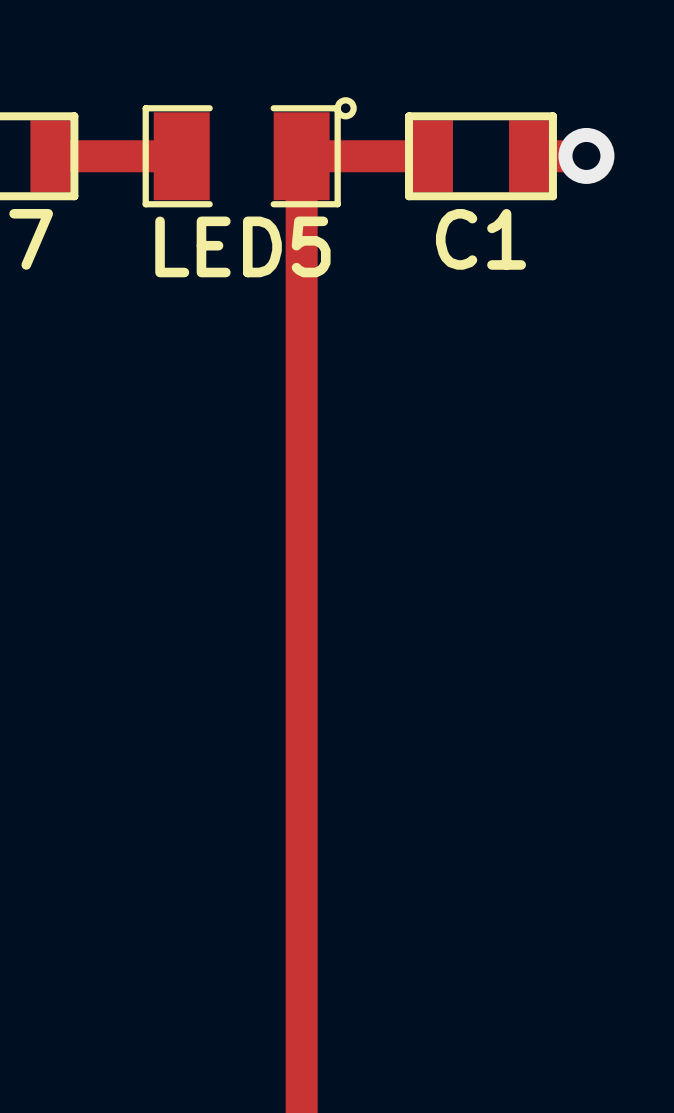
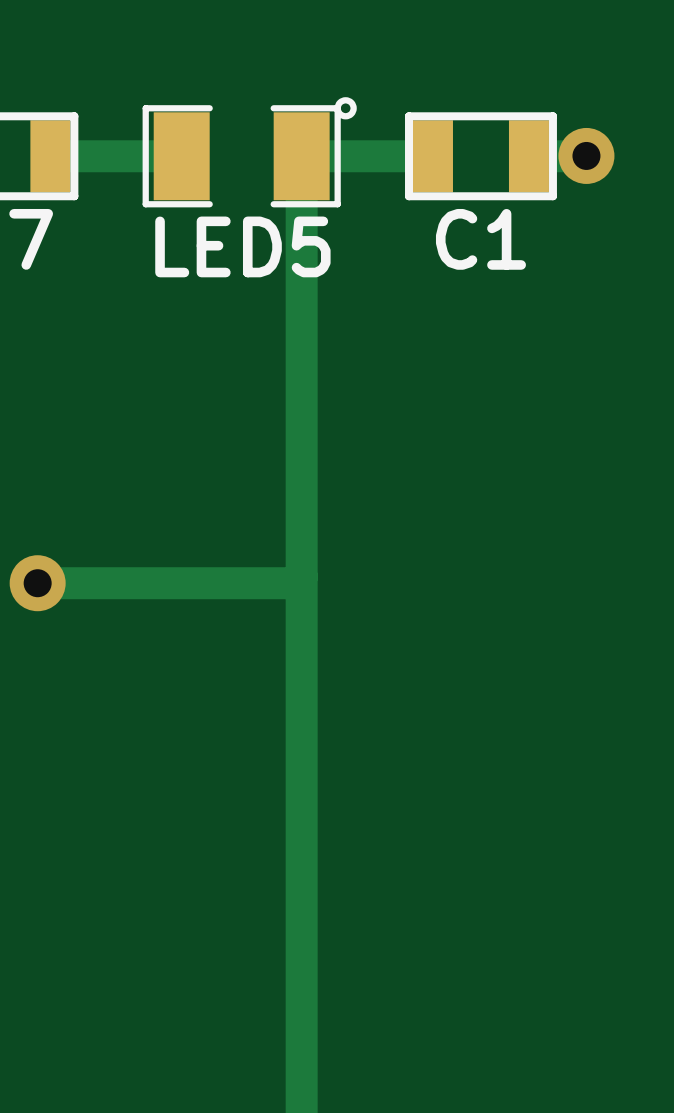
track: none -> (301, 576) (295, 583) (37, 583)
via: none -> (37, 583)

